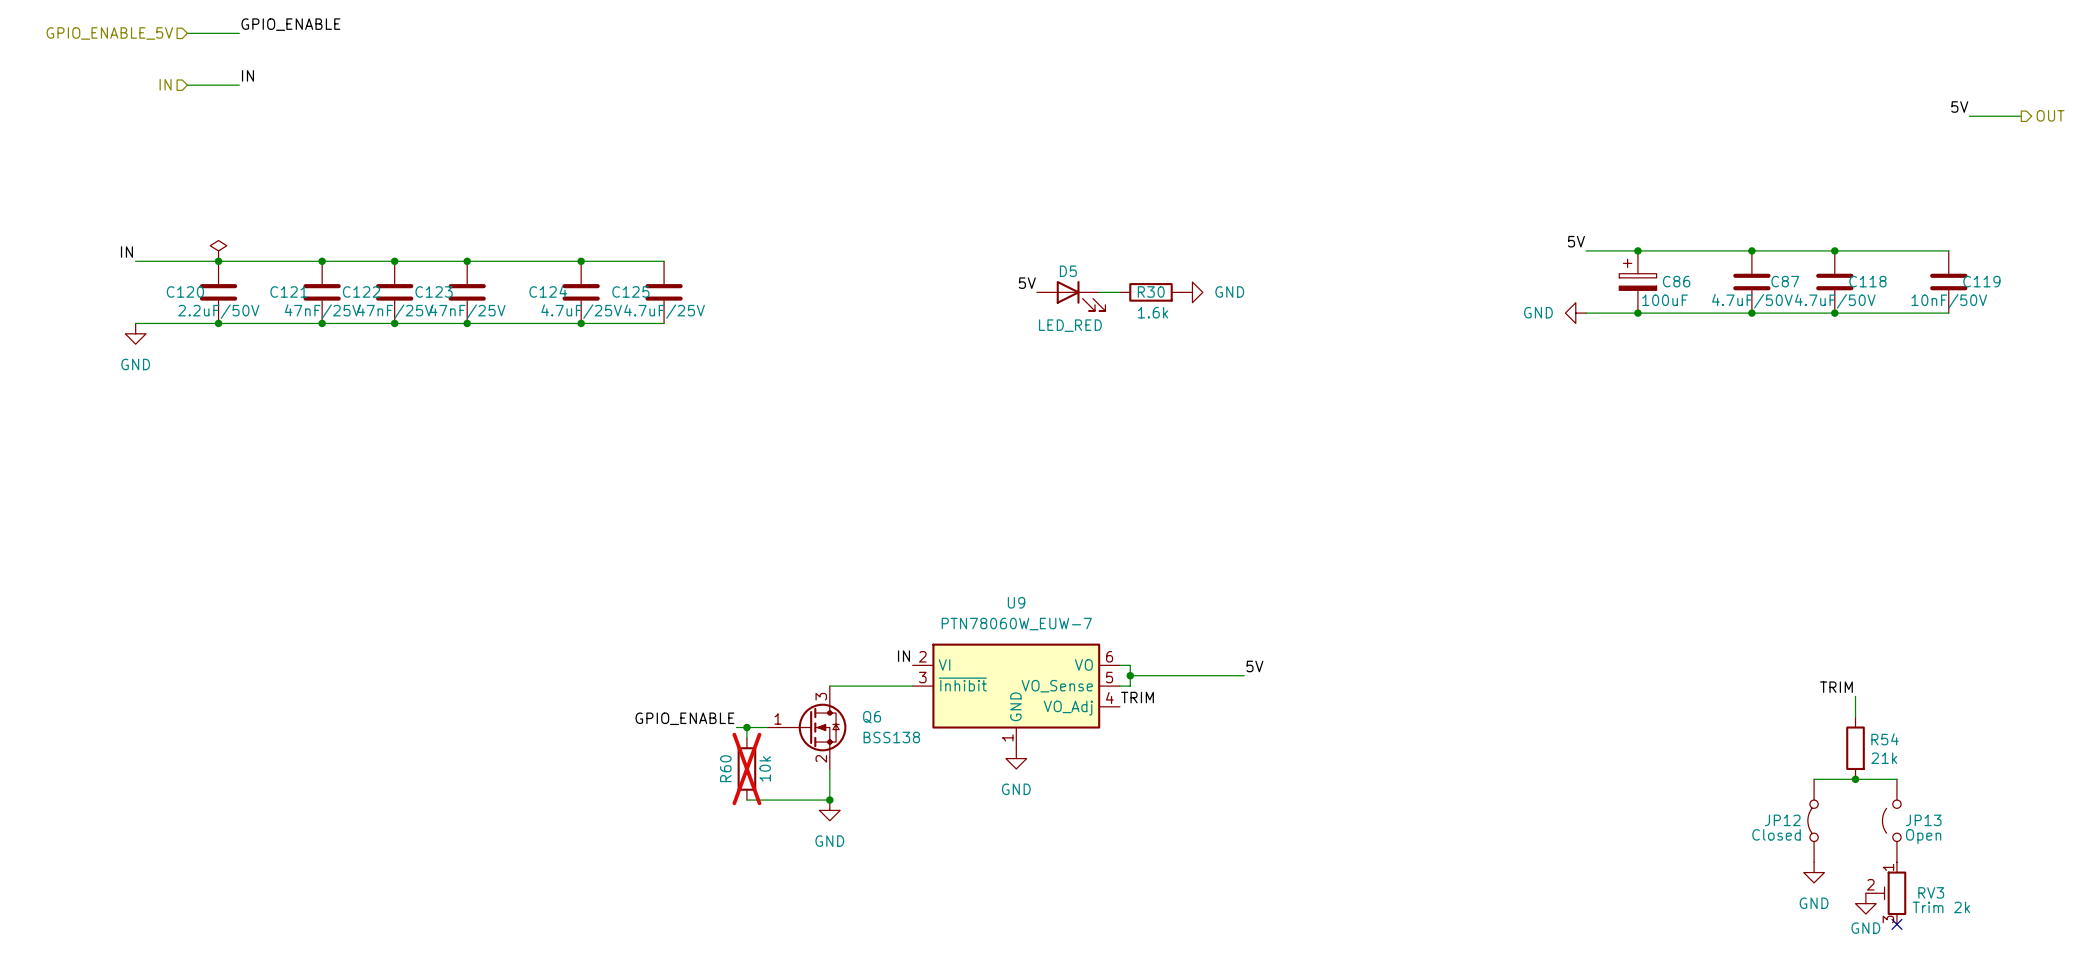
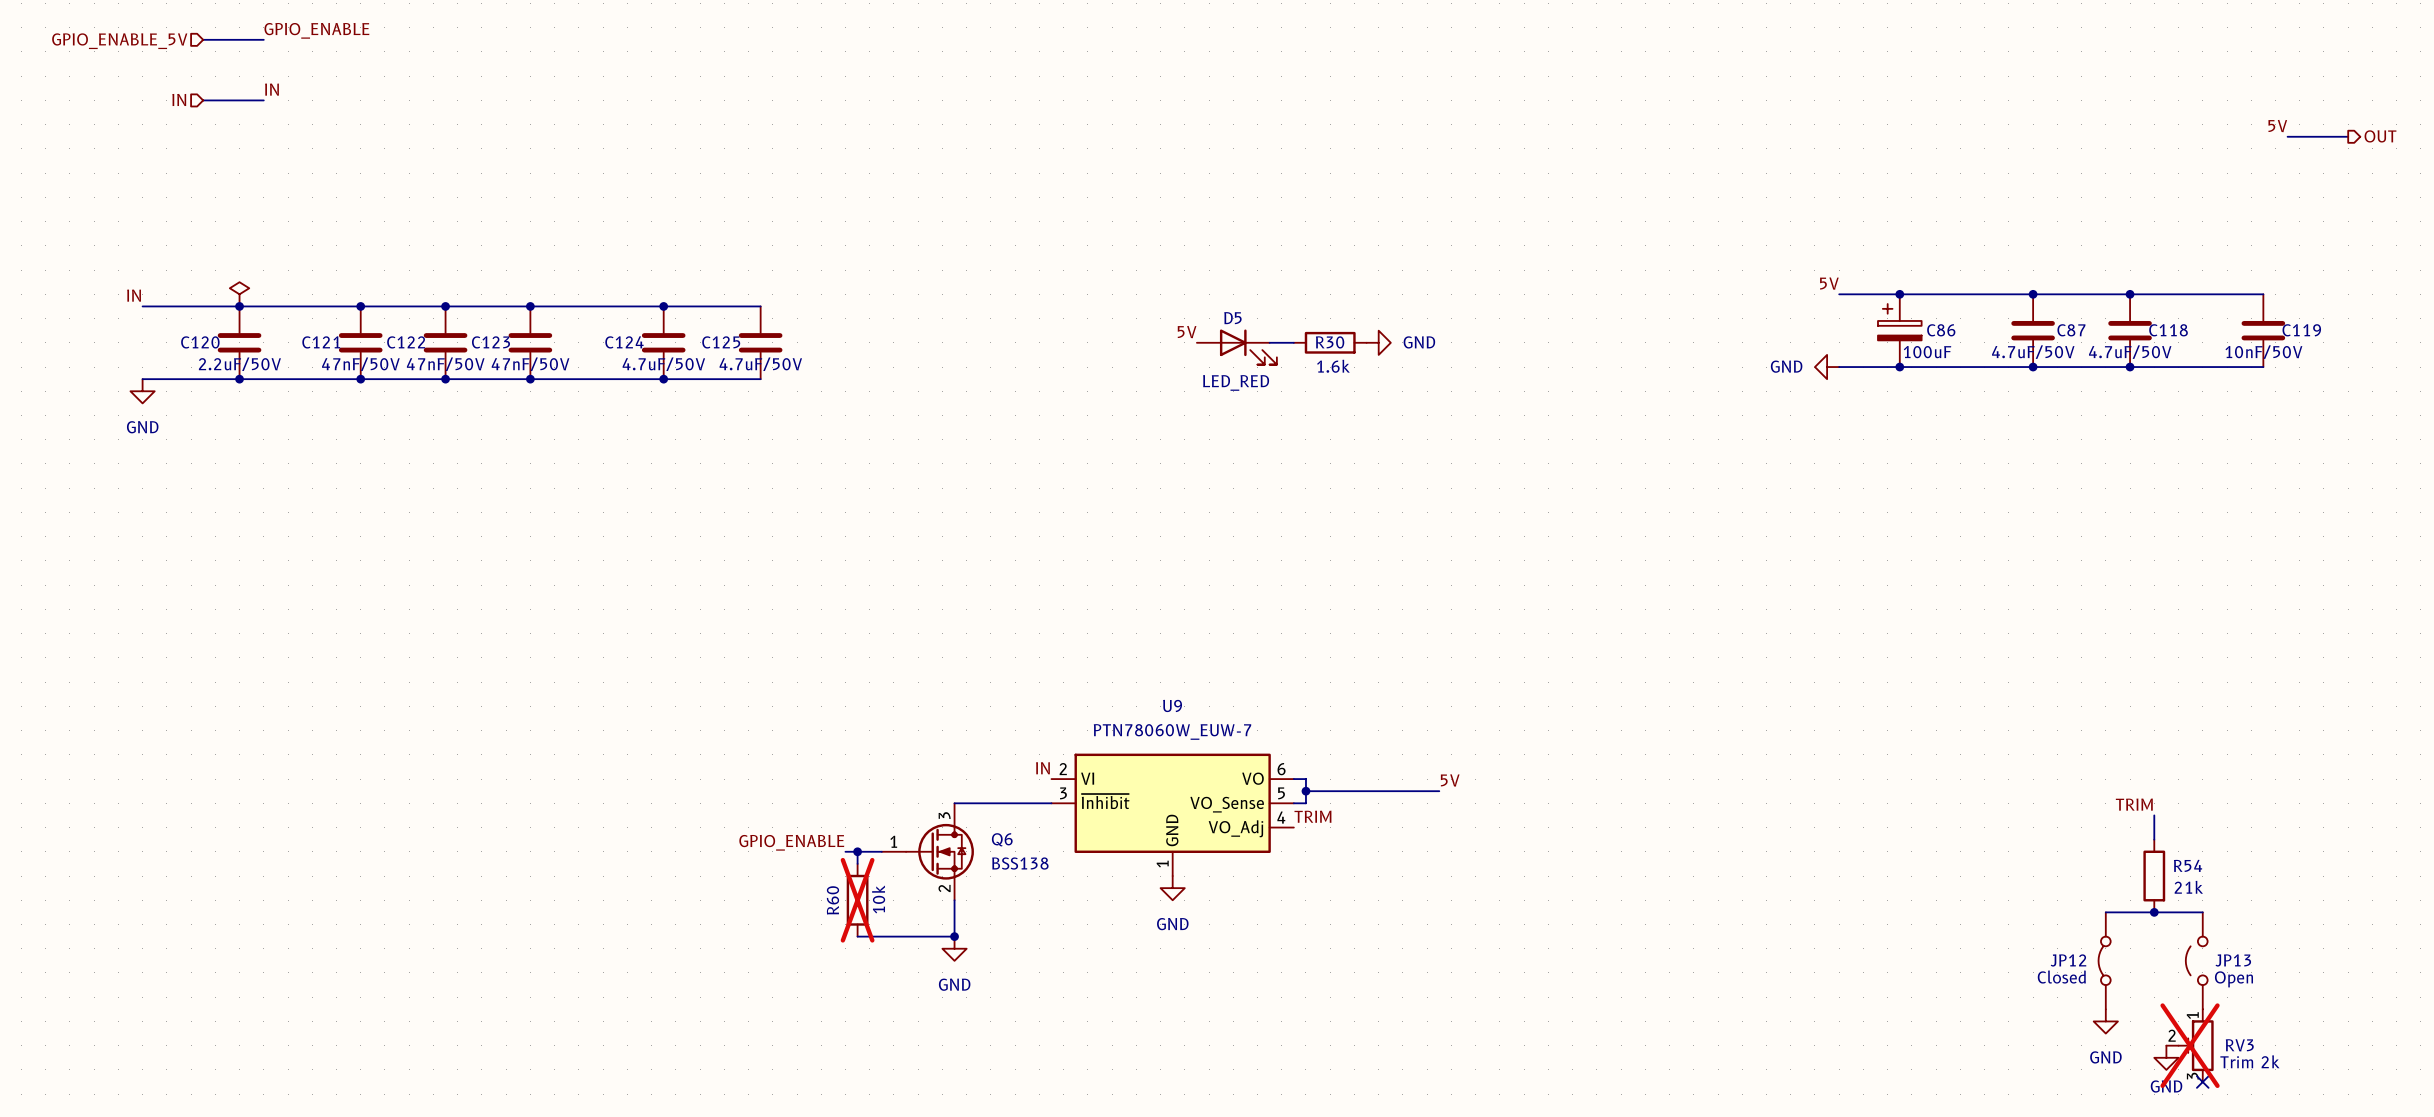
C121 value: 47nF/25V (322, 311) -> 47nF/50V (360, 364)
C122 value: 47nF/25V (395, 311) -> 47nF/50V (445, 364)
C123 value: 47nF/25V (467, 311) -> 47nF/50V (530, 364)
C124 value: 4.7uF/25V (581, 311) -> 4.7uF/50V (663, 364)
C125 value: 4.7uF/25V (664, 311) -> 4.7uF/50V (760, 364)
RV3 do-not-place cross: none -> (2190, 1045)

